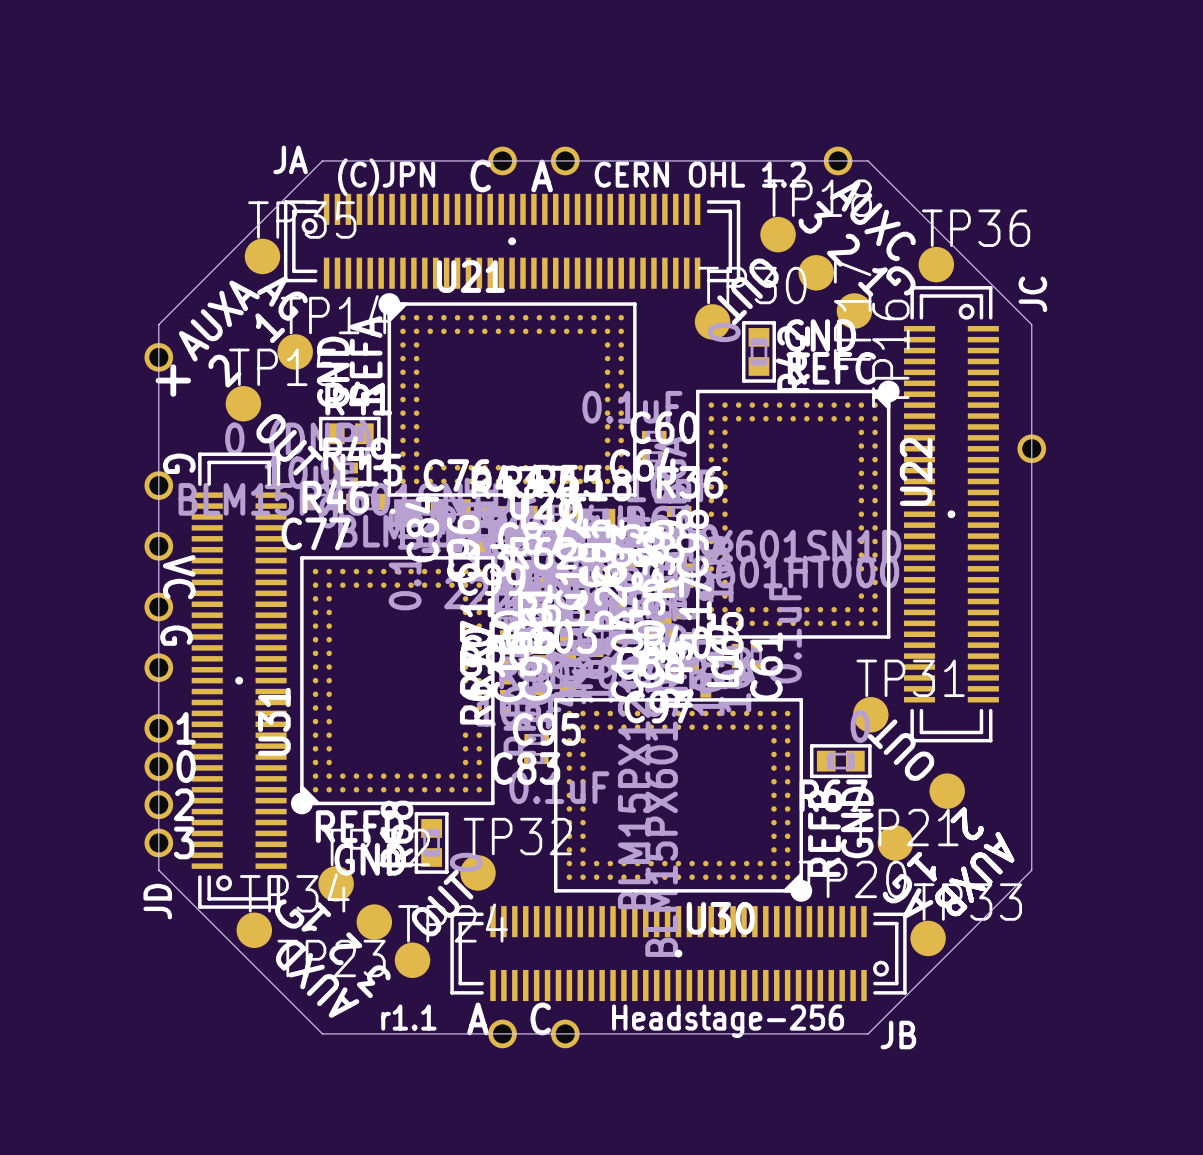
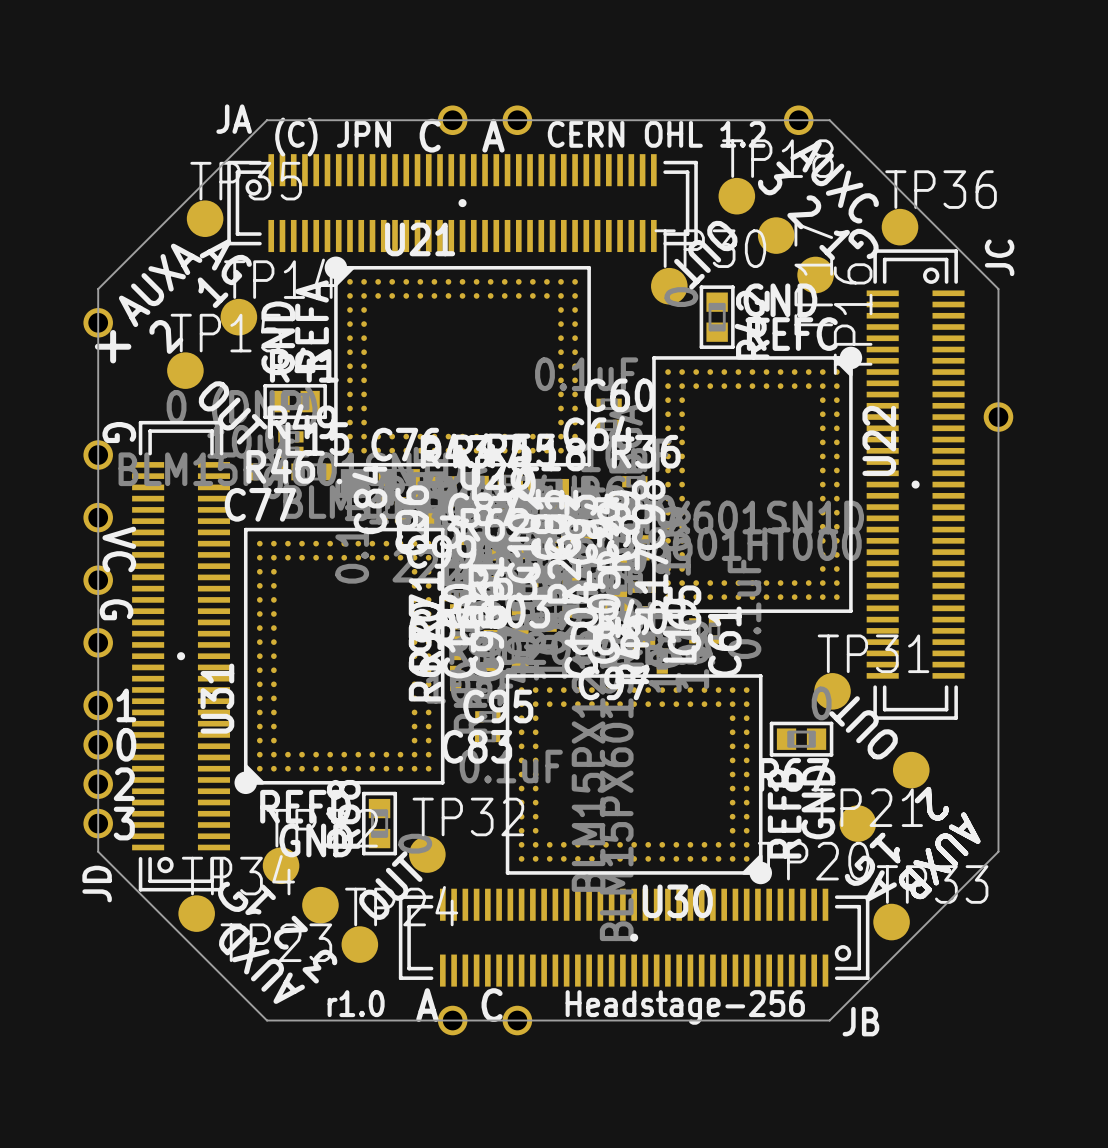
text: (C)JPN (386, 177) -> (C) JPN (333, 137)
text: r1.1 (408, 1017) -> r1.0 (356, 1003)

